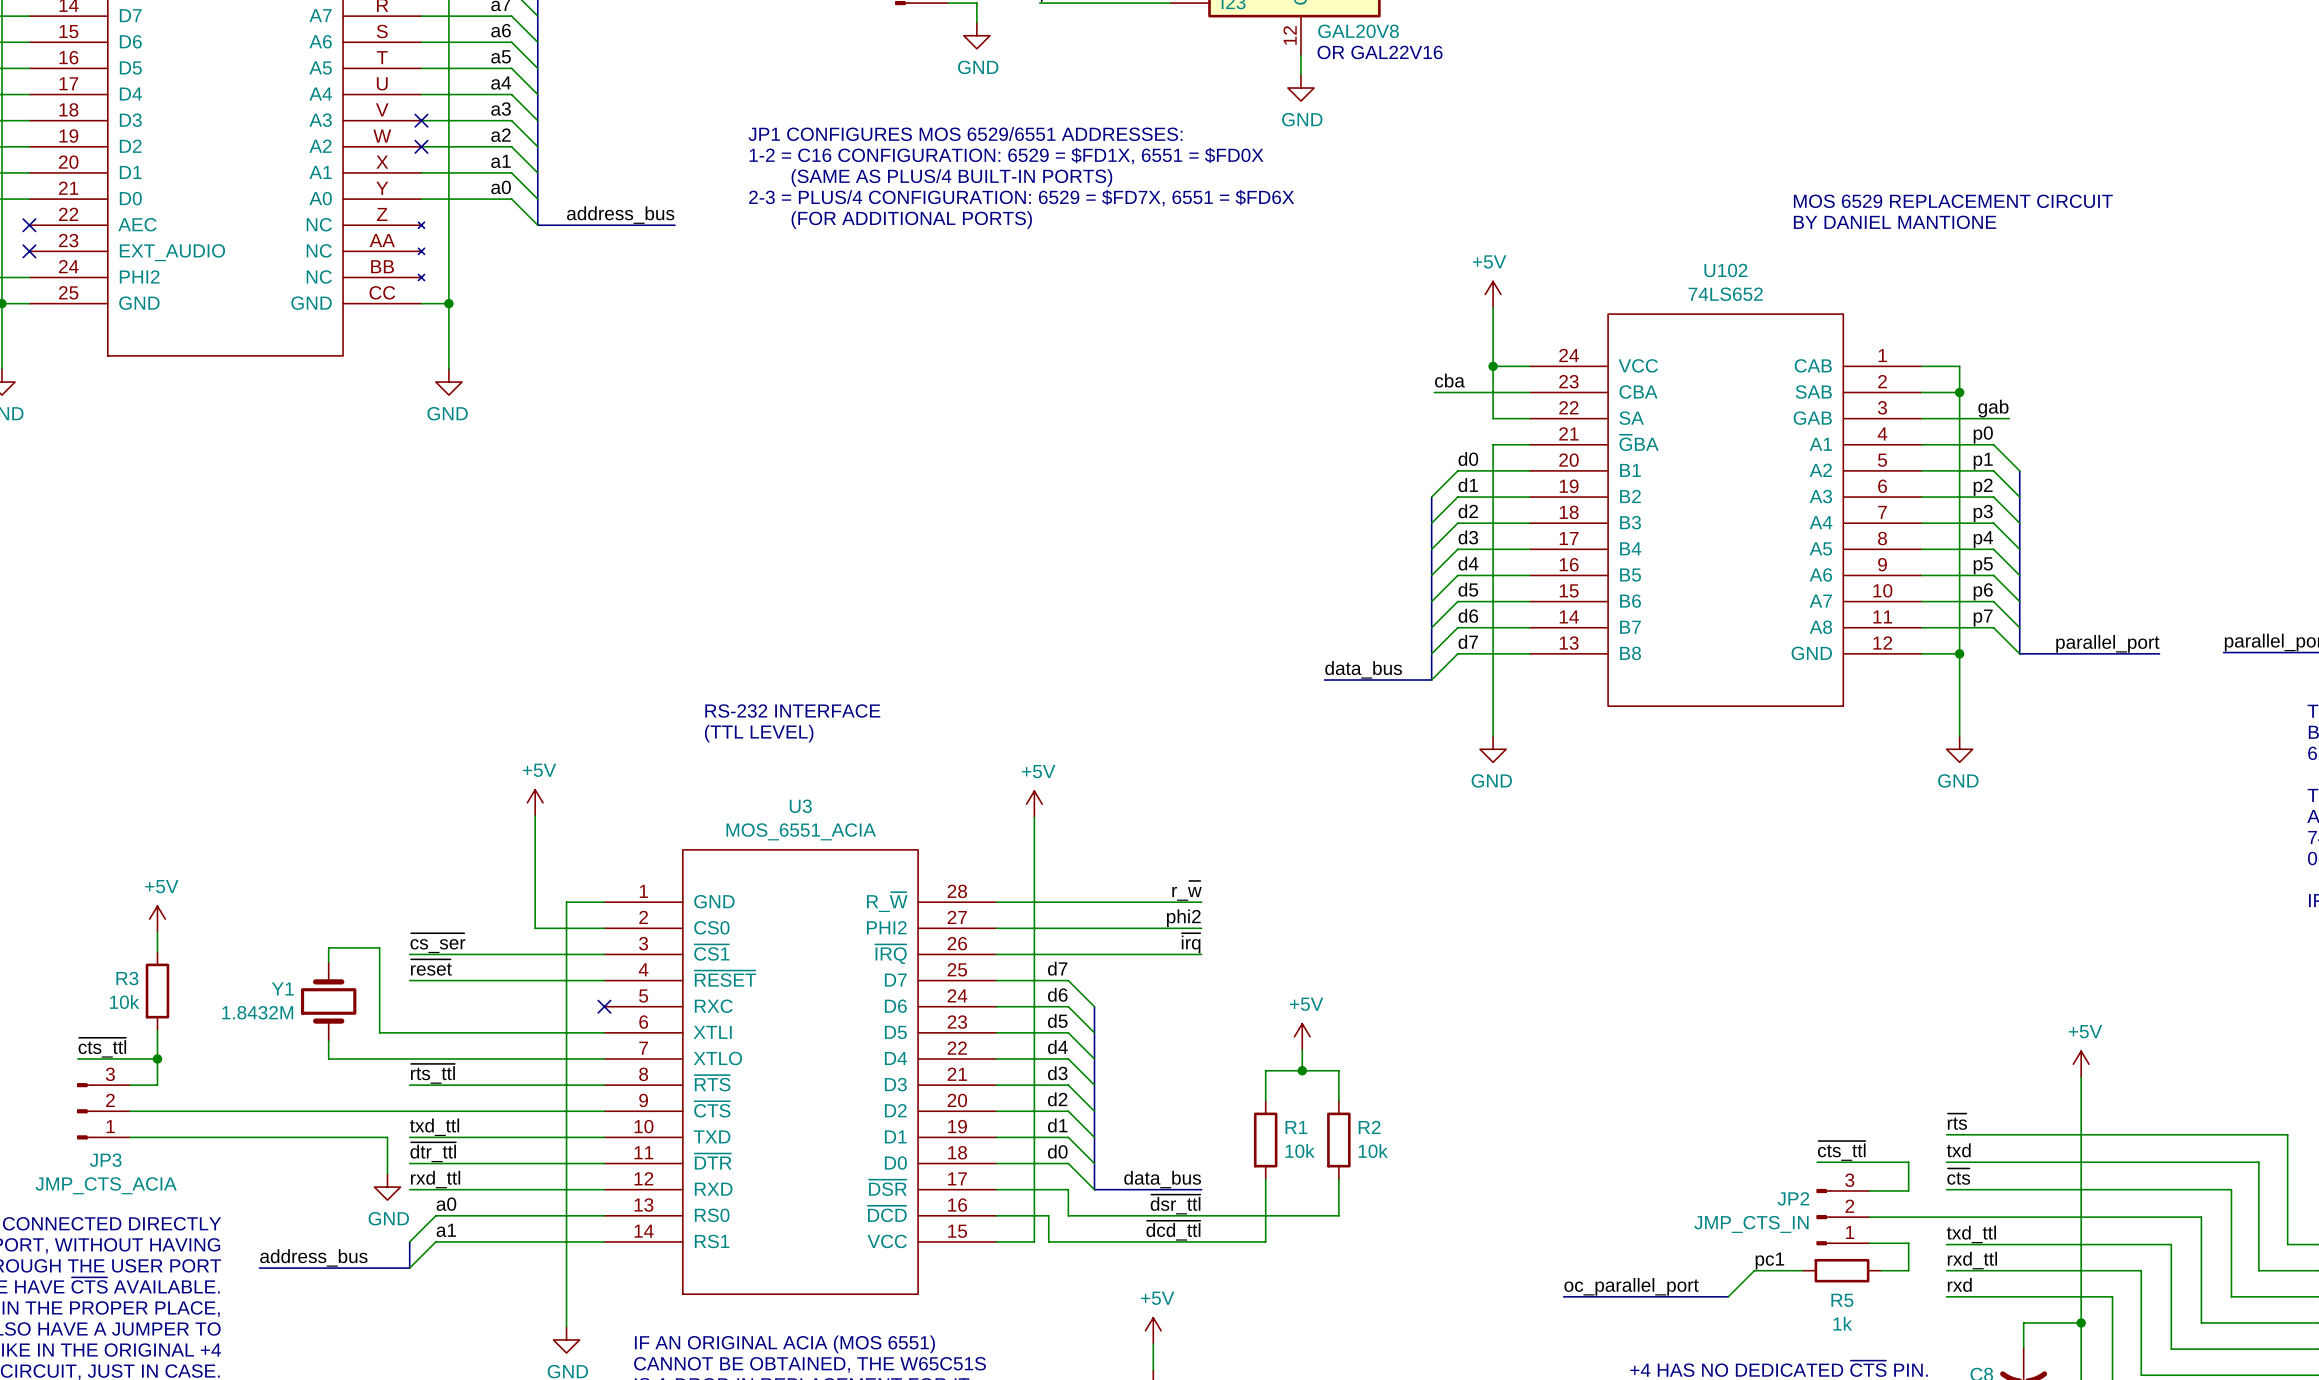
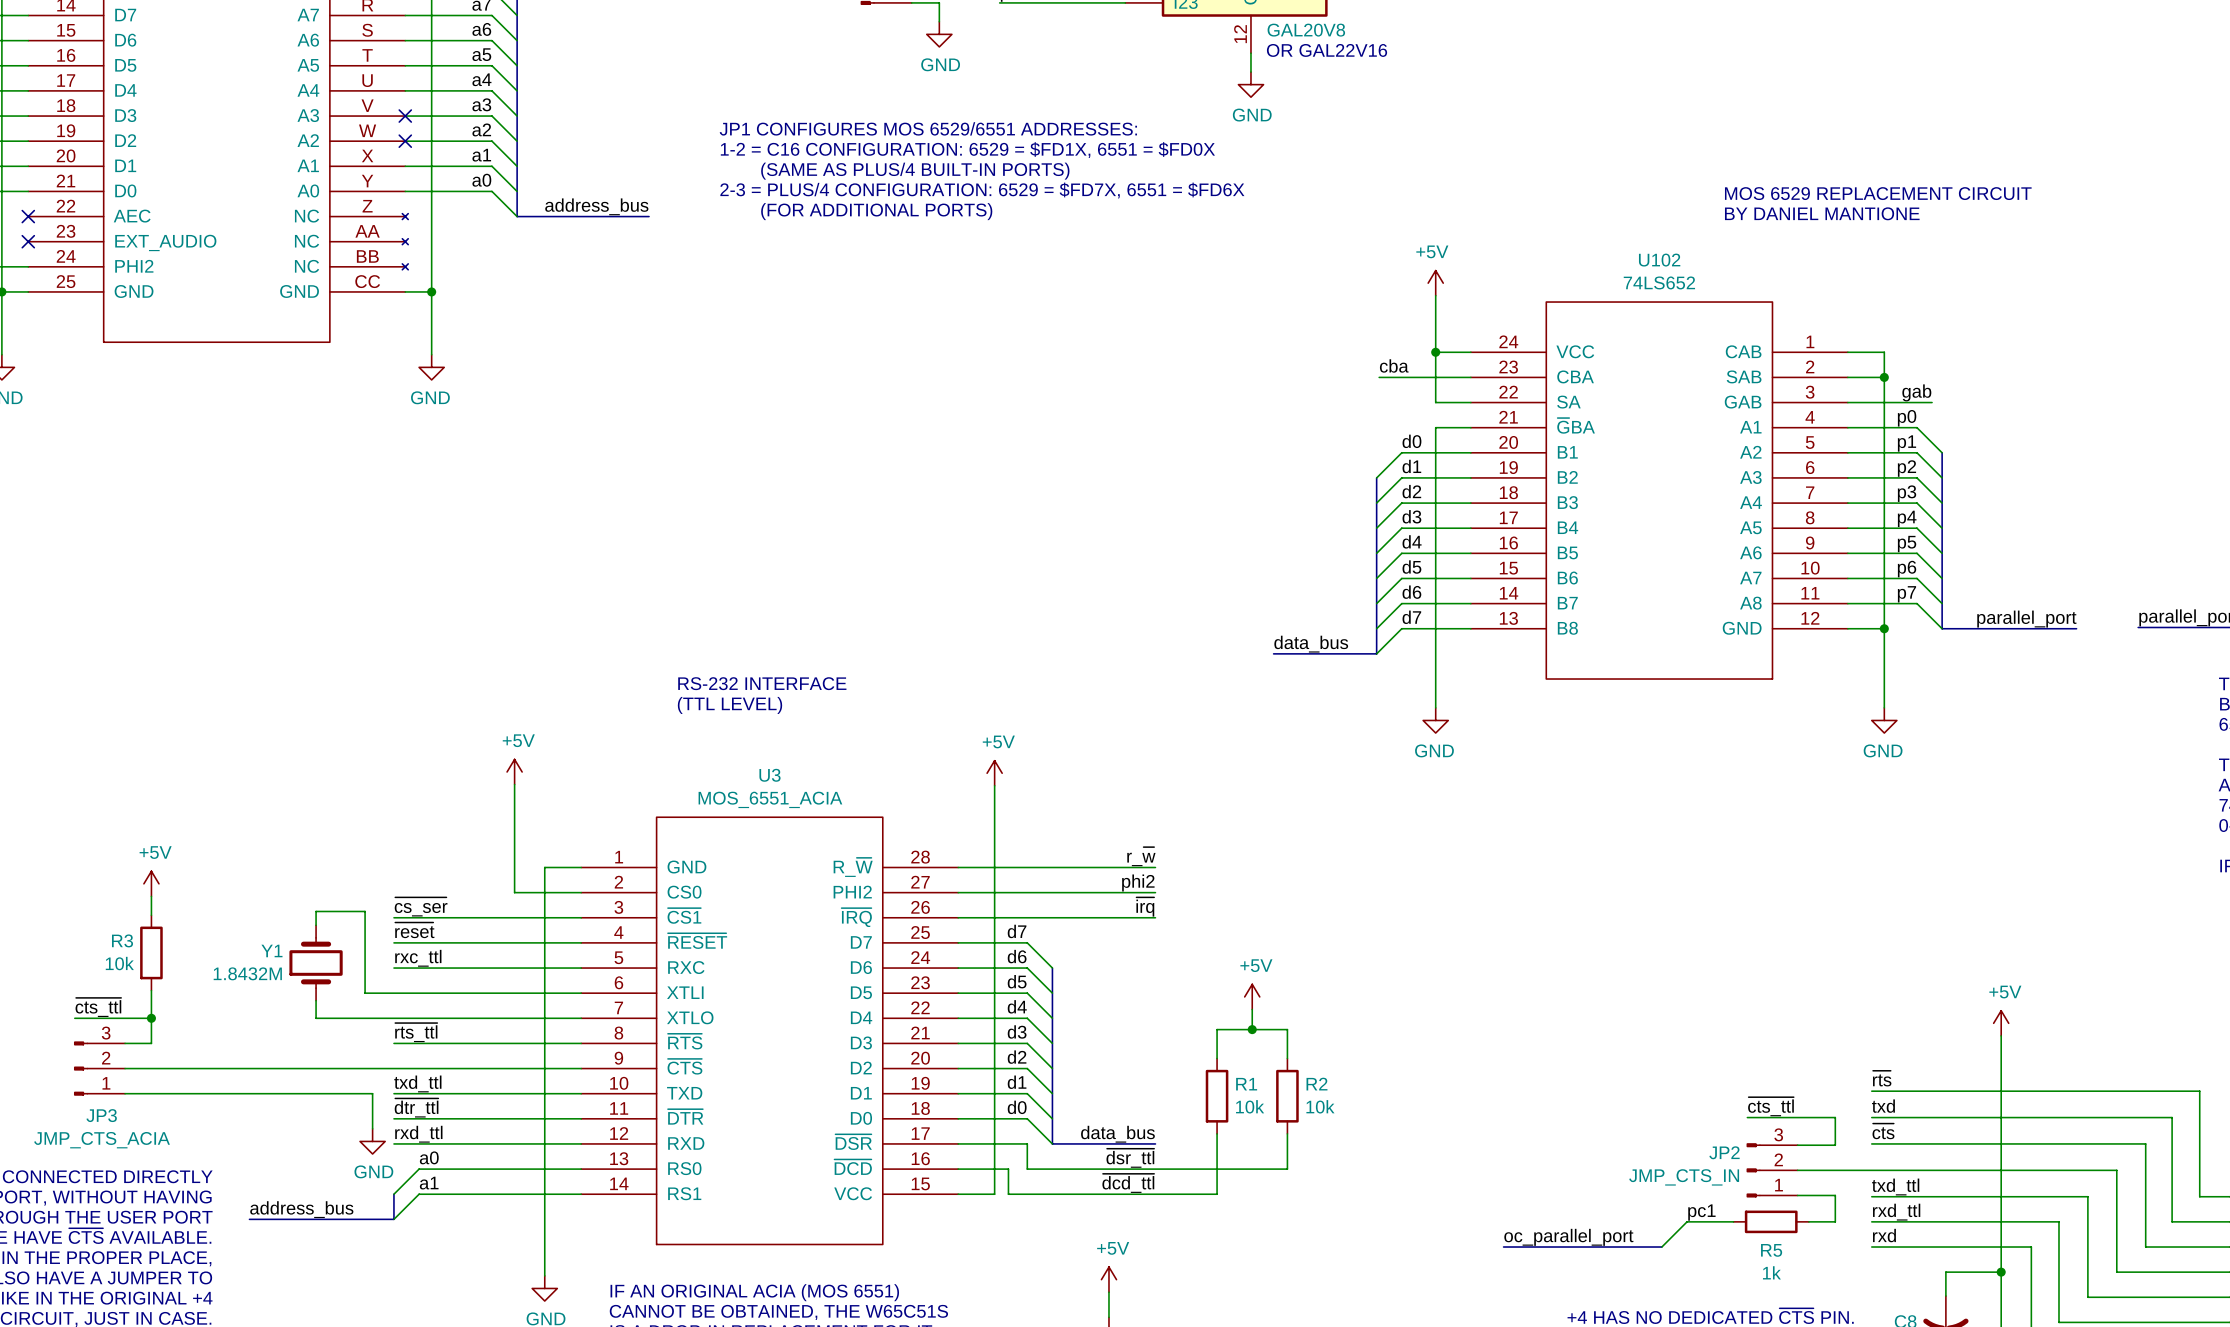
label: none -> rxc_ttl (418, 958)
wire: none -> (393, 968) (581, 968)
no-connect mark: (604, 1006) -> none

